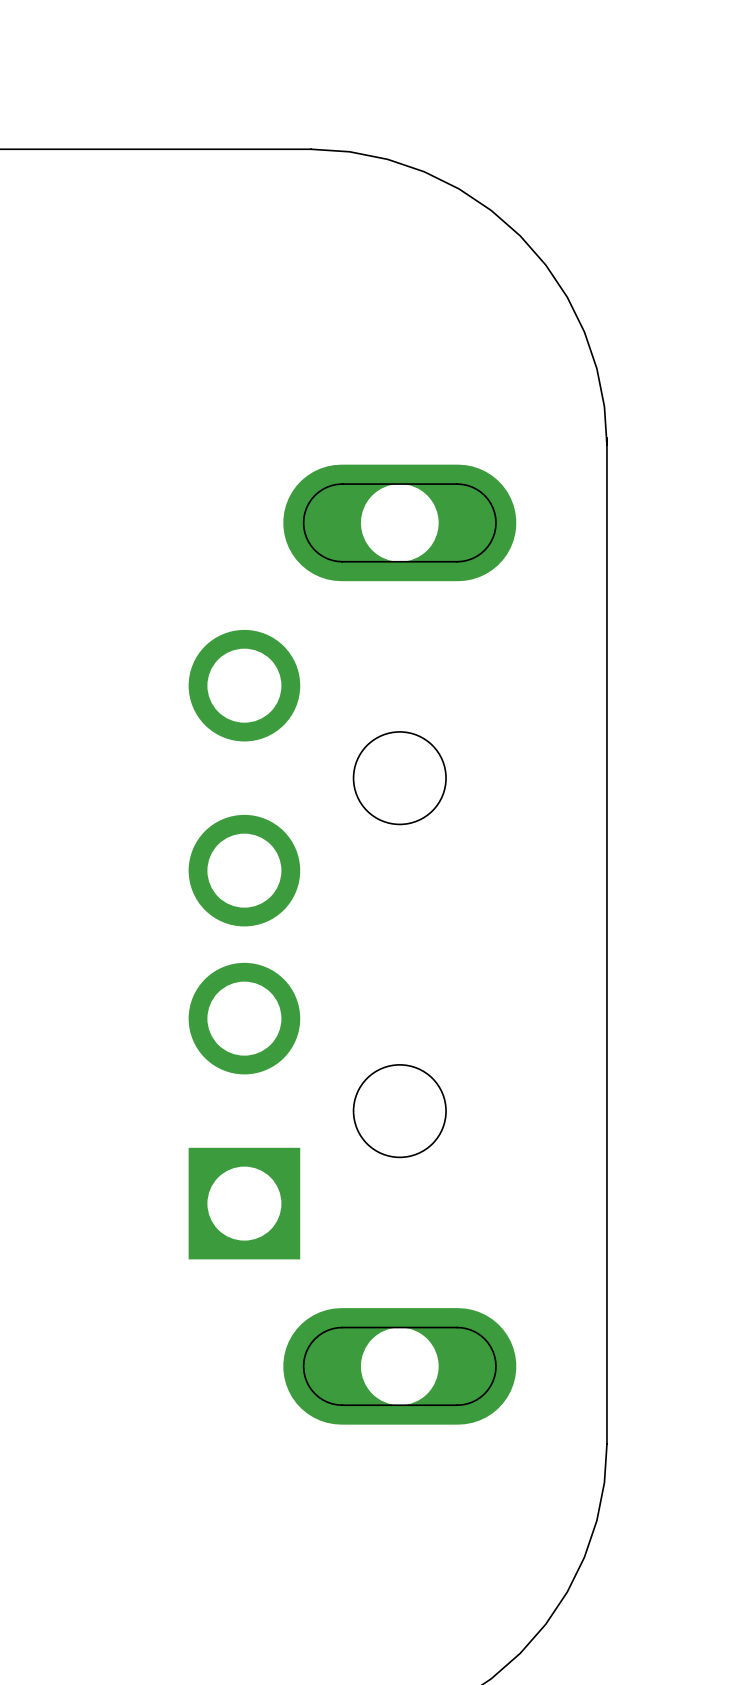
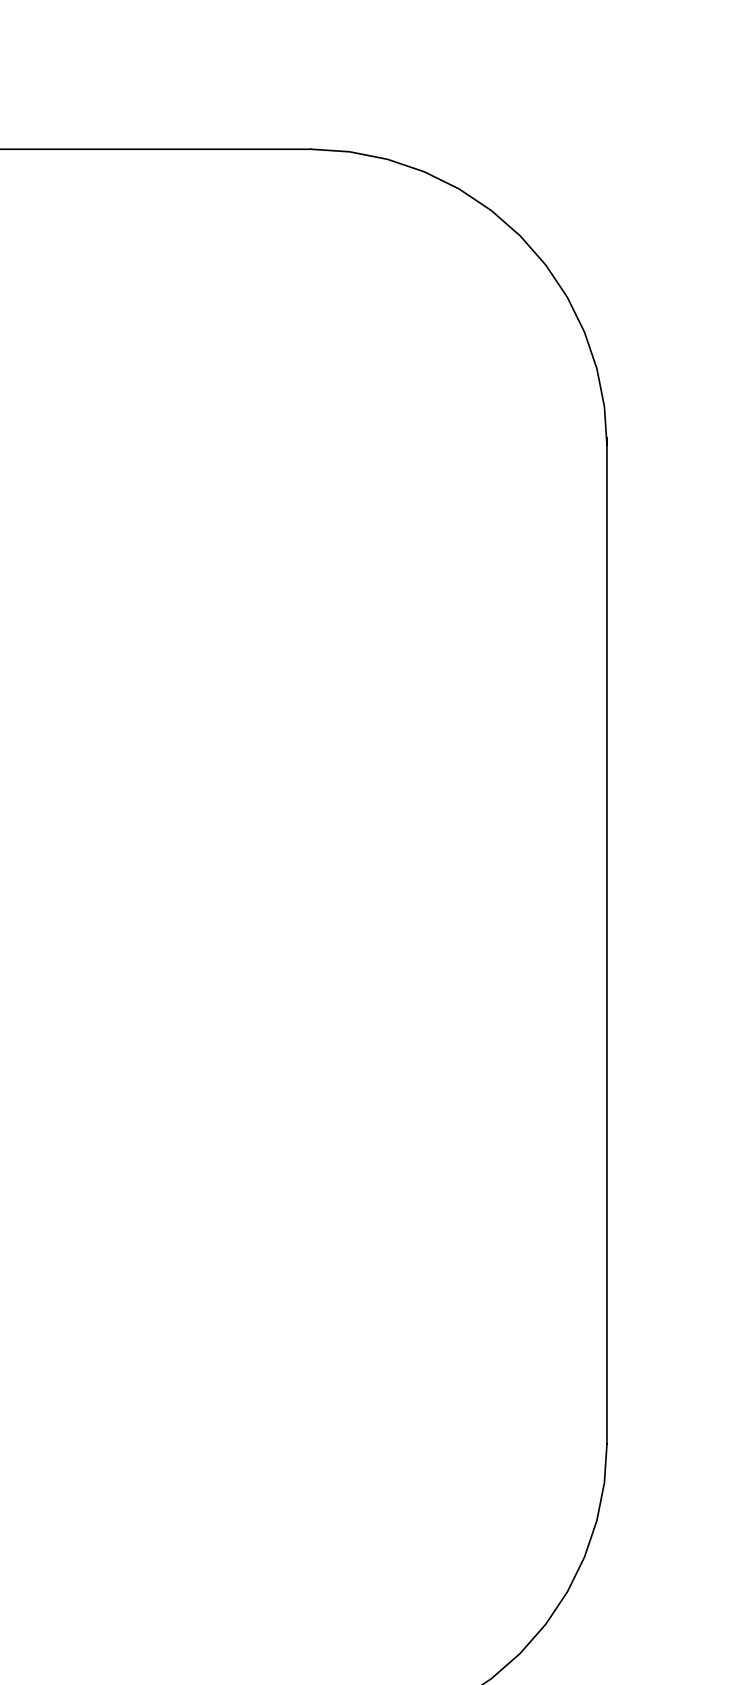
part: (352, 944) -> none

